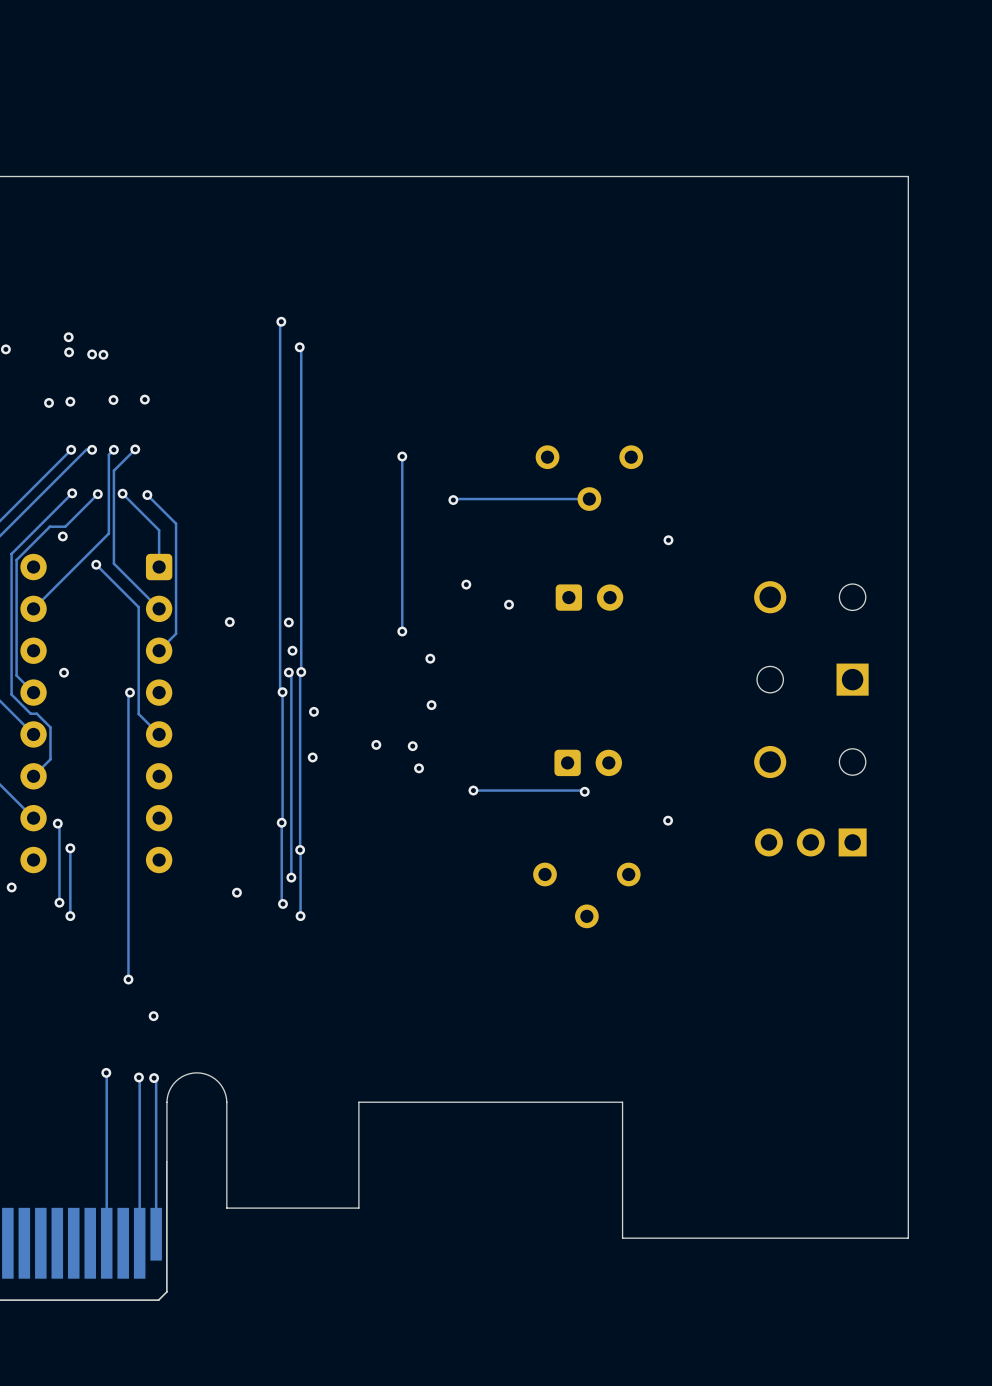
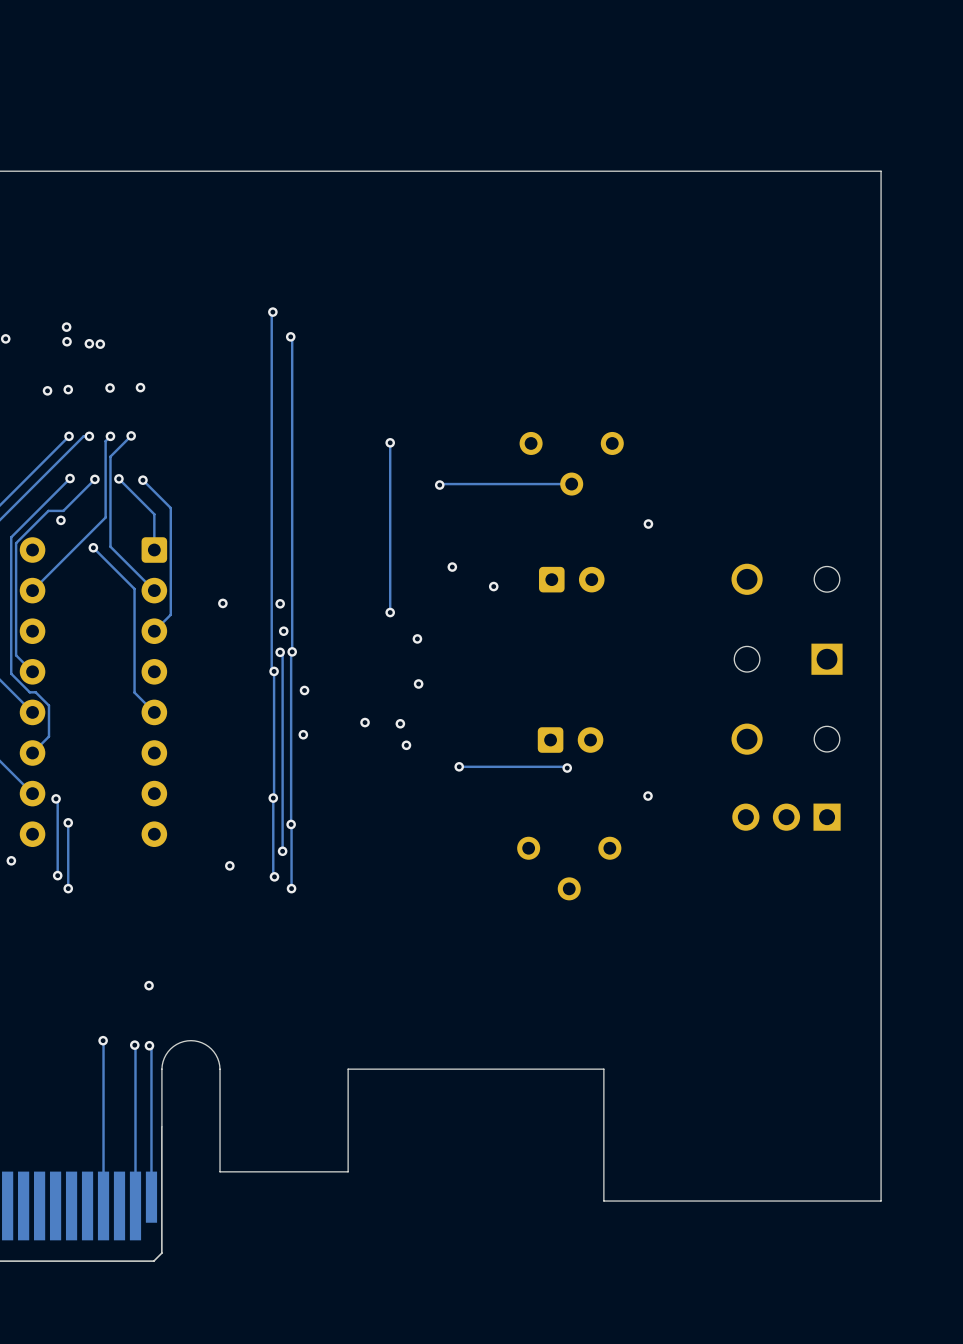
via: (64, 672) -> none
track: (129, 692) (128, 694) (128, 979) -> none
via: (129, 692) -> none
via: (128, 979) -> none

